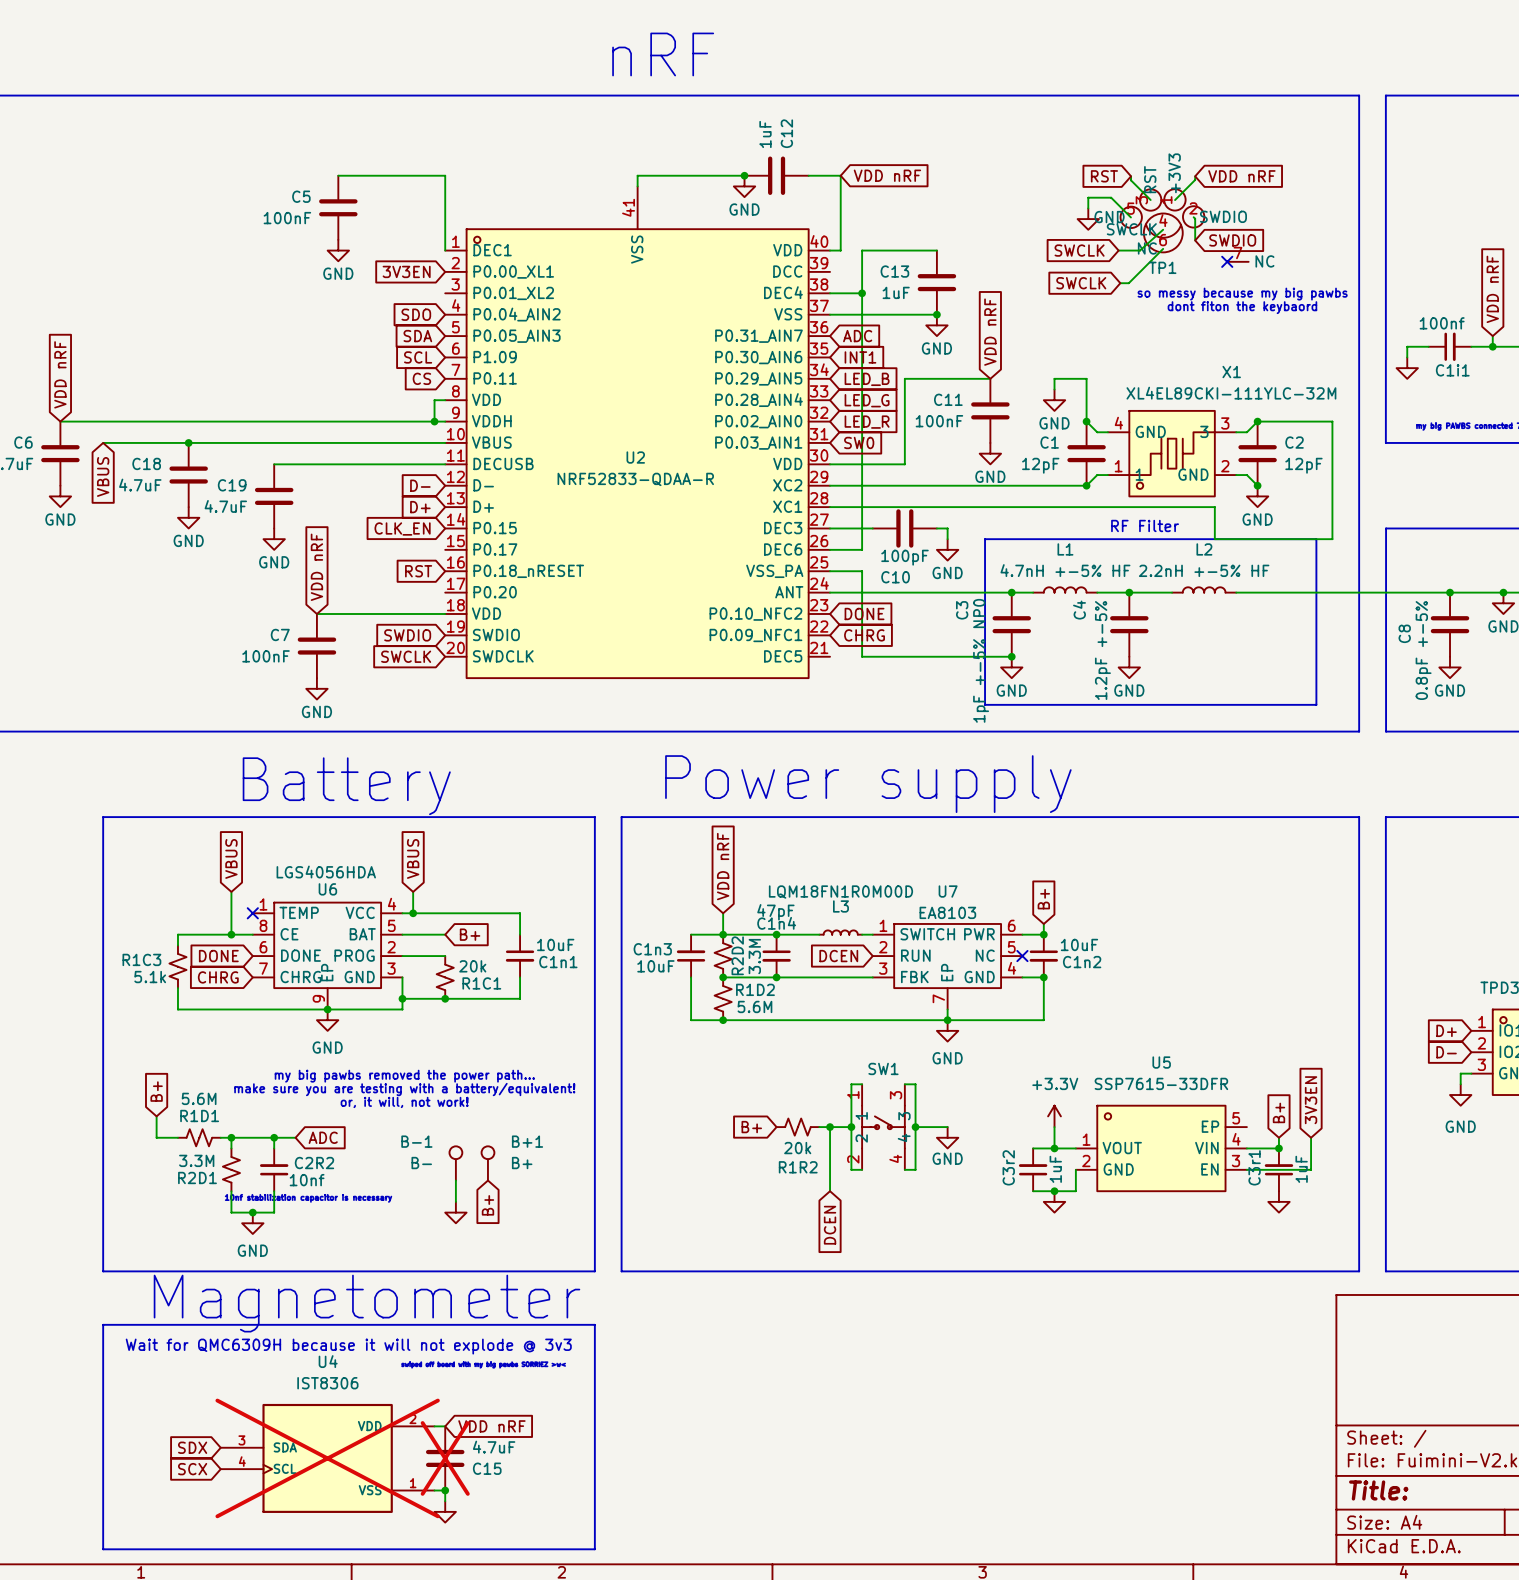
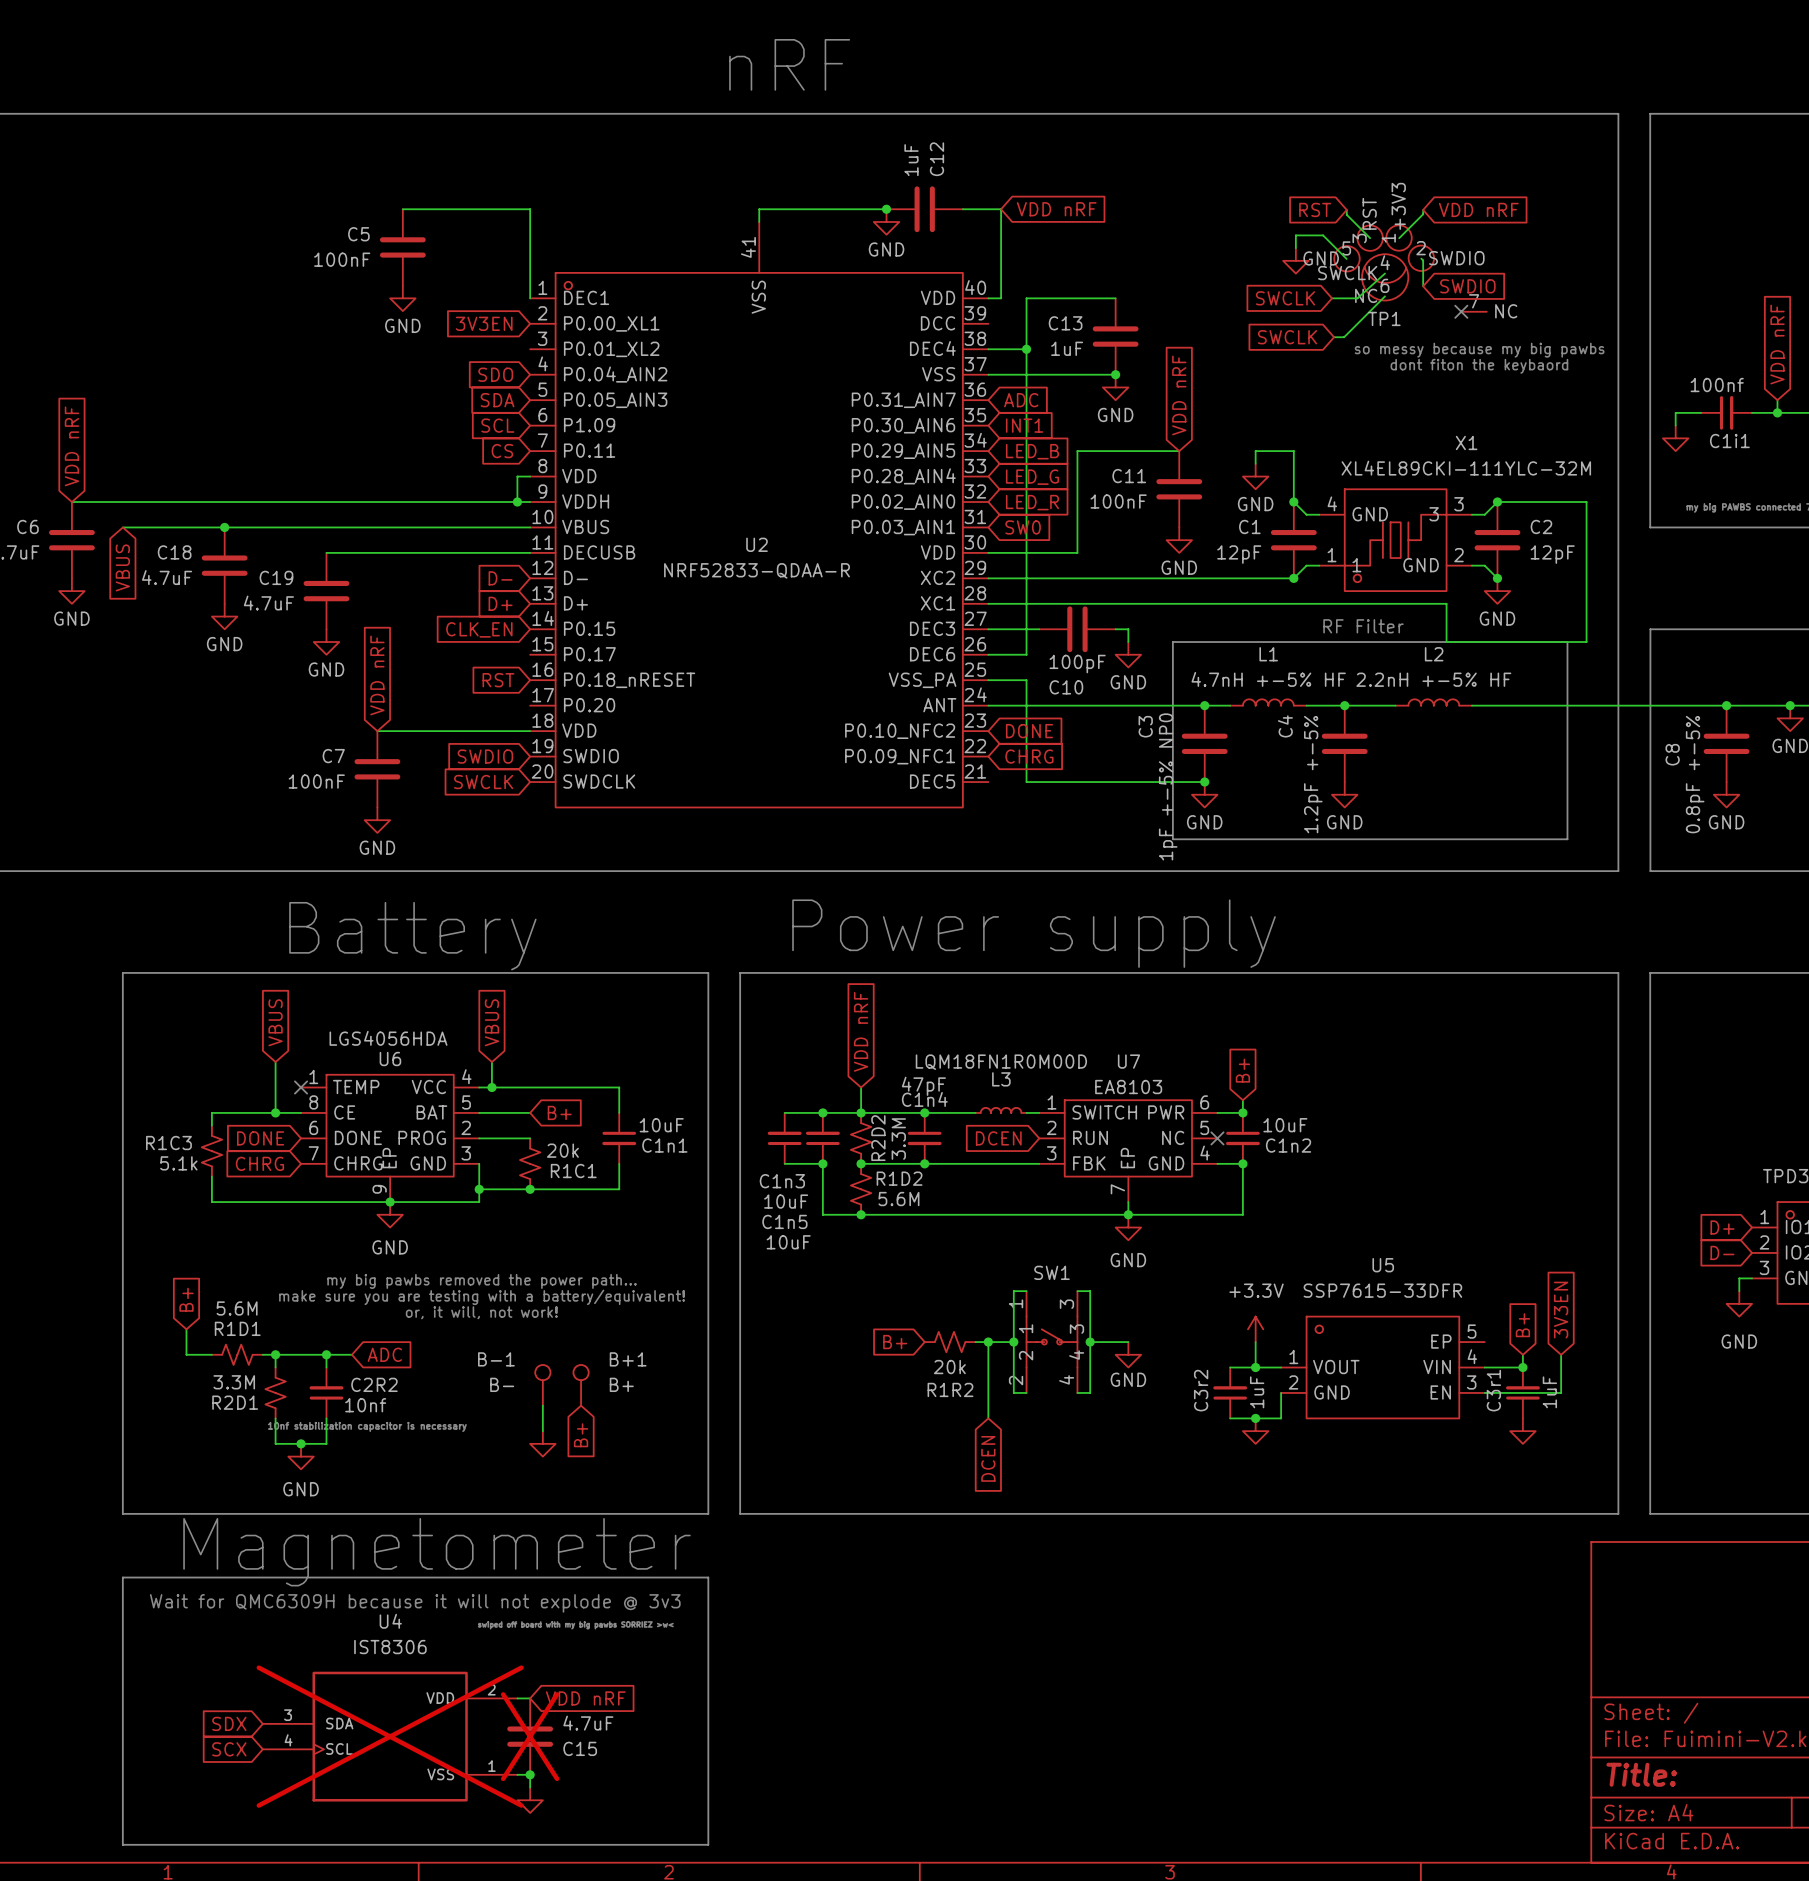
wire: none -> (784, 1112) (822, 1112)
junction: none -> (822, 1112)
C1n3 name position: C1n3 (652, 949) -> C1n3 (782, 1181)
C1n5: none -> 10uF (784, 1138)
C1n3 value position: 10uF (655, 966) -> 10uF (786, 1201)
wire: none -> (784, 1163) (822, 1163)
junction: none -> (822, 1163)

